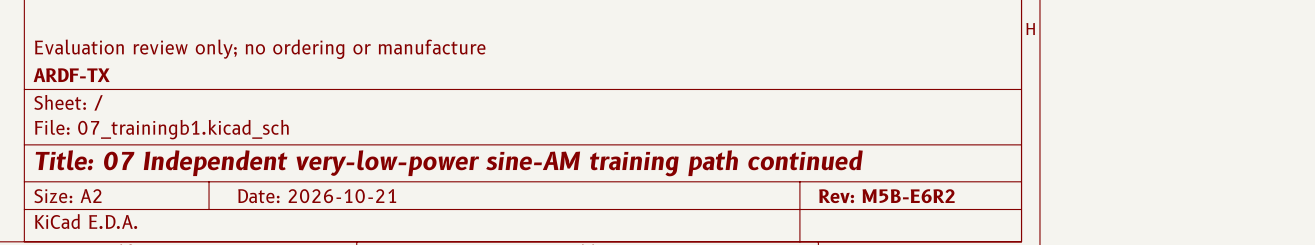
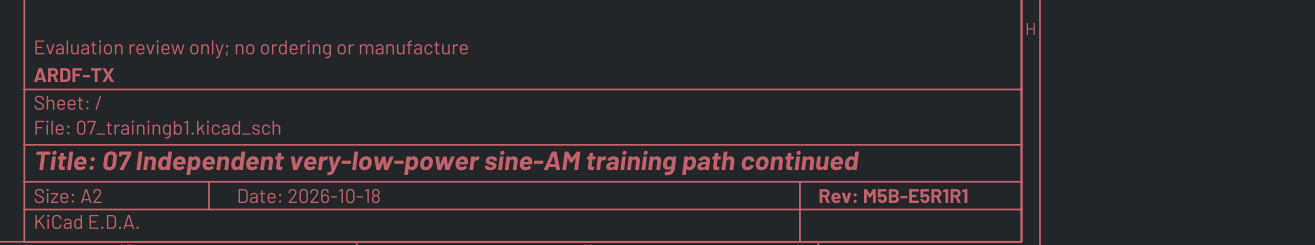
title block: Date: 2026-10-21 (317, 196) -> Date: 2026-10-18 (309, 196)
title block: Rev: M5B-E6R2 (886, 196) -> Rev: M5B-E5R1R1 (893, 196)

